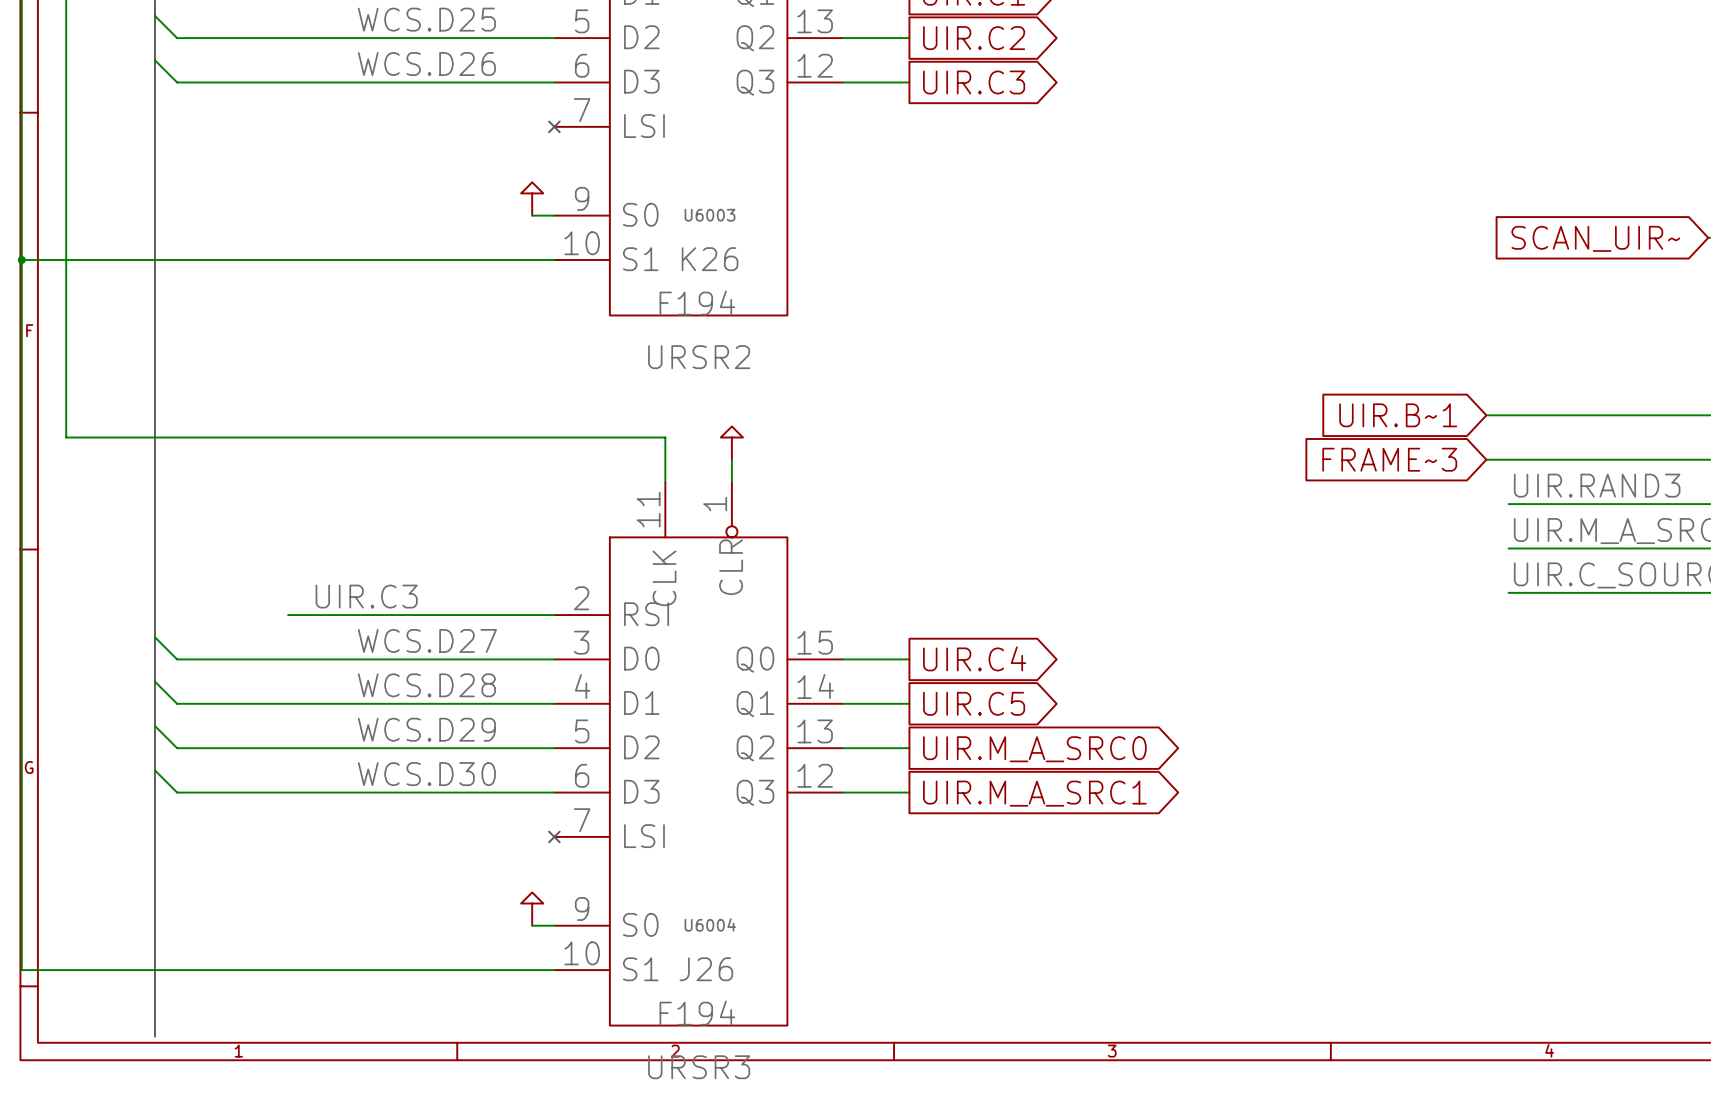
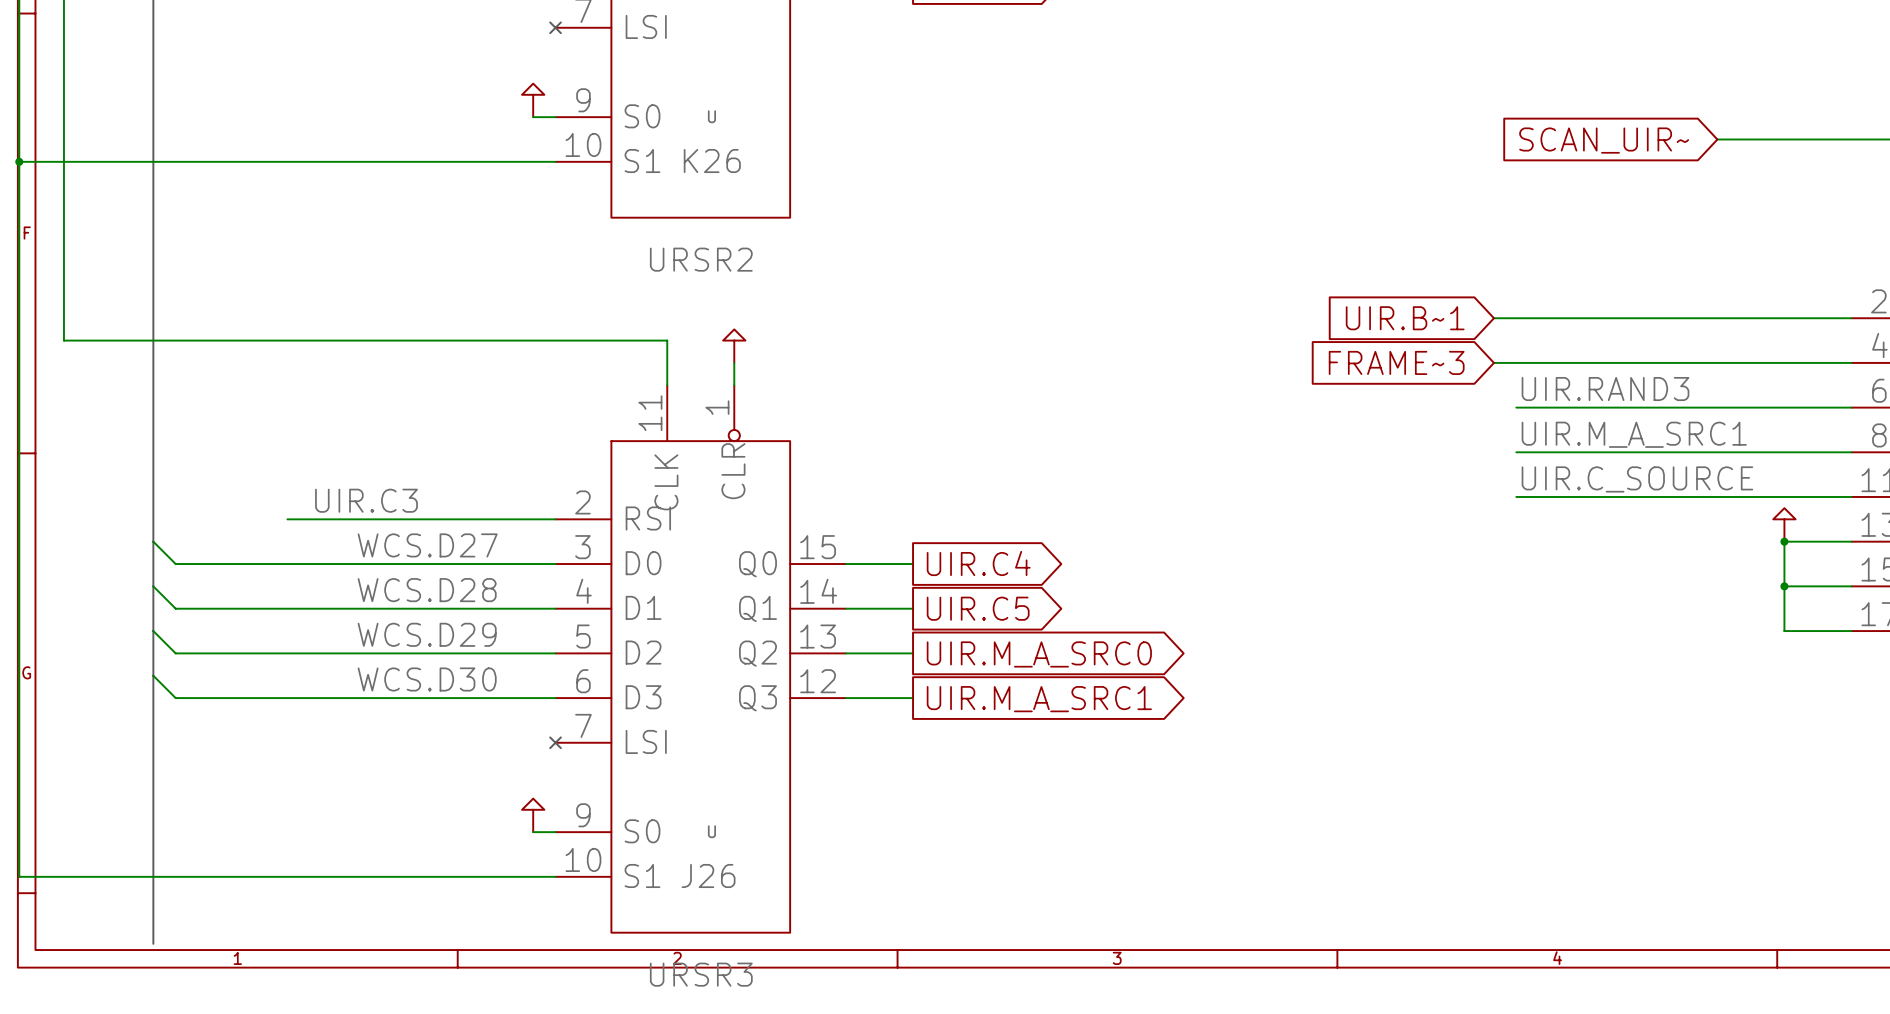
U6003 name: U6003 (709, 215) -> U (711, 116)
U6003 value: F194 (697, 303) -> none
U6004 name: U6004 (710, 925) -> U (711, 831)
U6004 value: F194 (697, 1013) -> none

